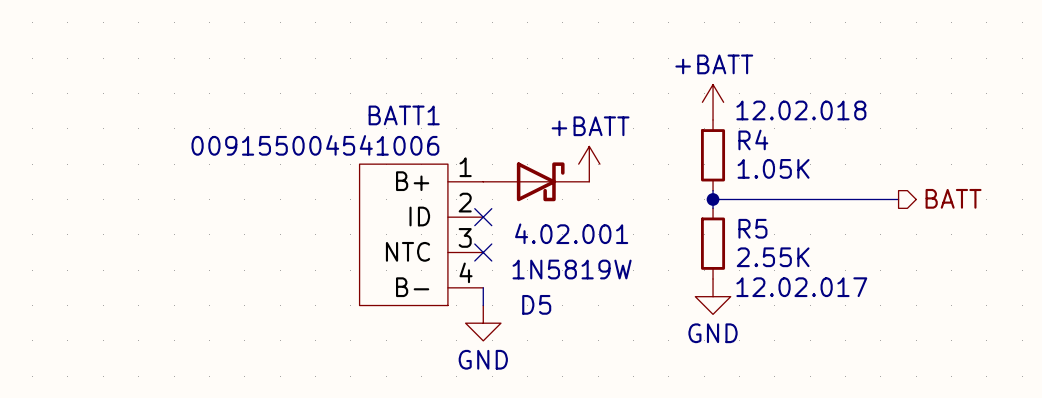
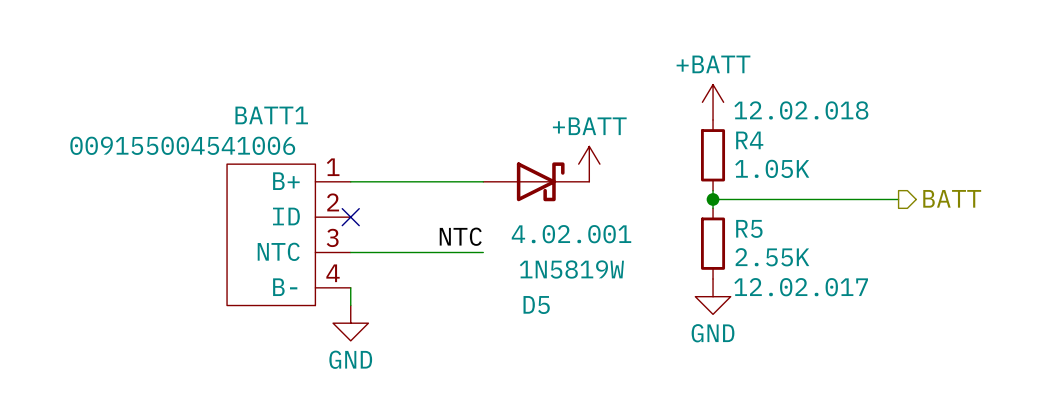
wire: none -> (350, 181) (483, 181)
no-connect mark: none -> (350, 217)
no-connect mark: (483, 217) -> none
BATT1 position: (421, 234) -> (288, 234)
label: none -> NTC (460, 236)
wire: none -> (350, 252) (483, 252)
no-connect mark: (483, 252) -> none
wire: (483, 287) (483, 305) -> (350, 287) (350, 305)
power symbol position: GND (483, 323) -> GND (350, 323)

